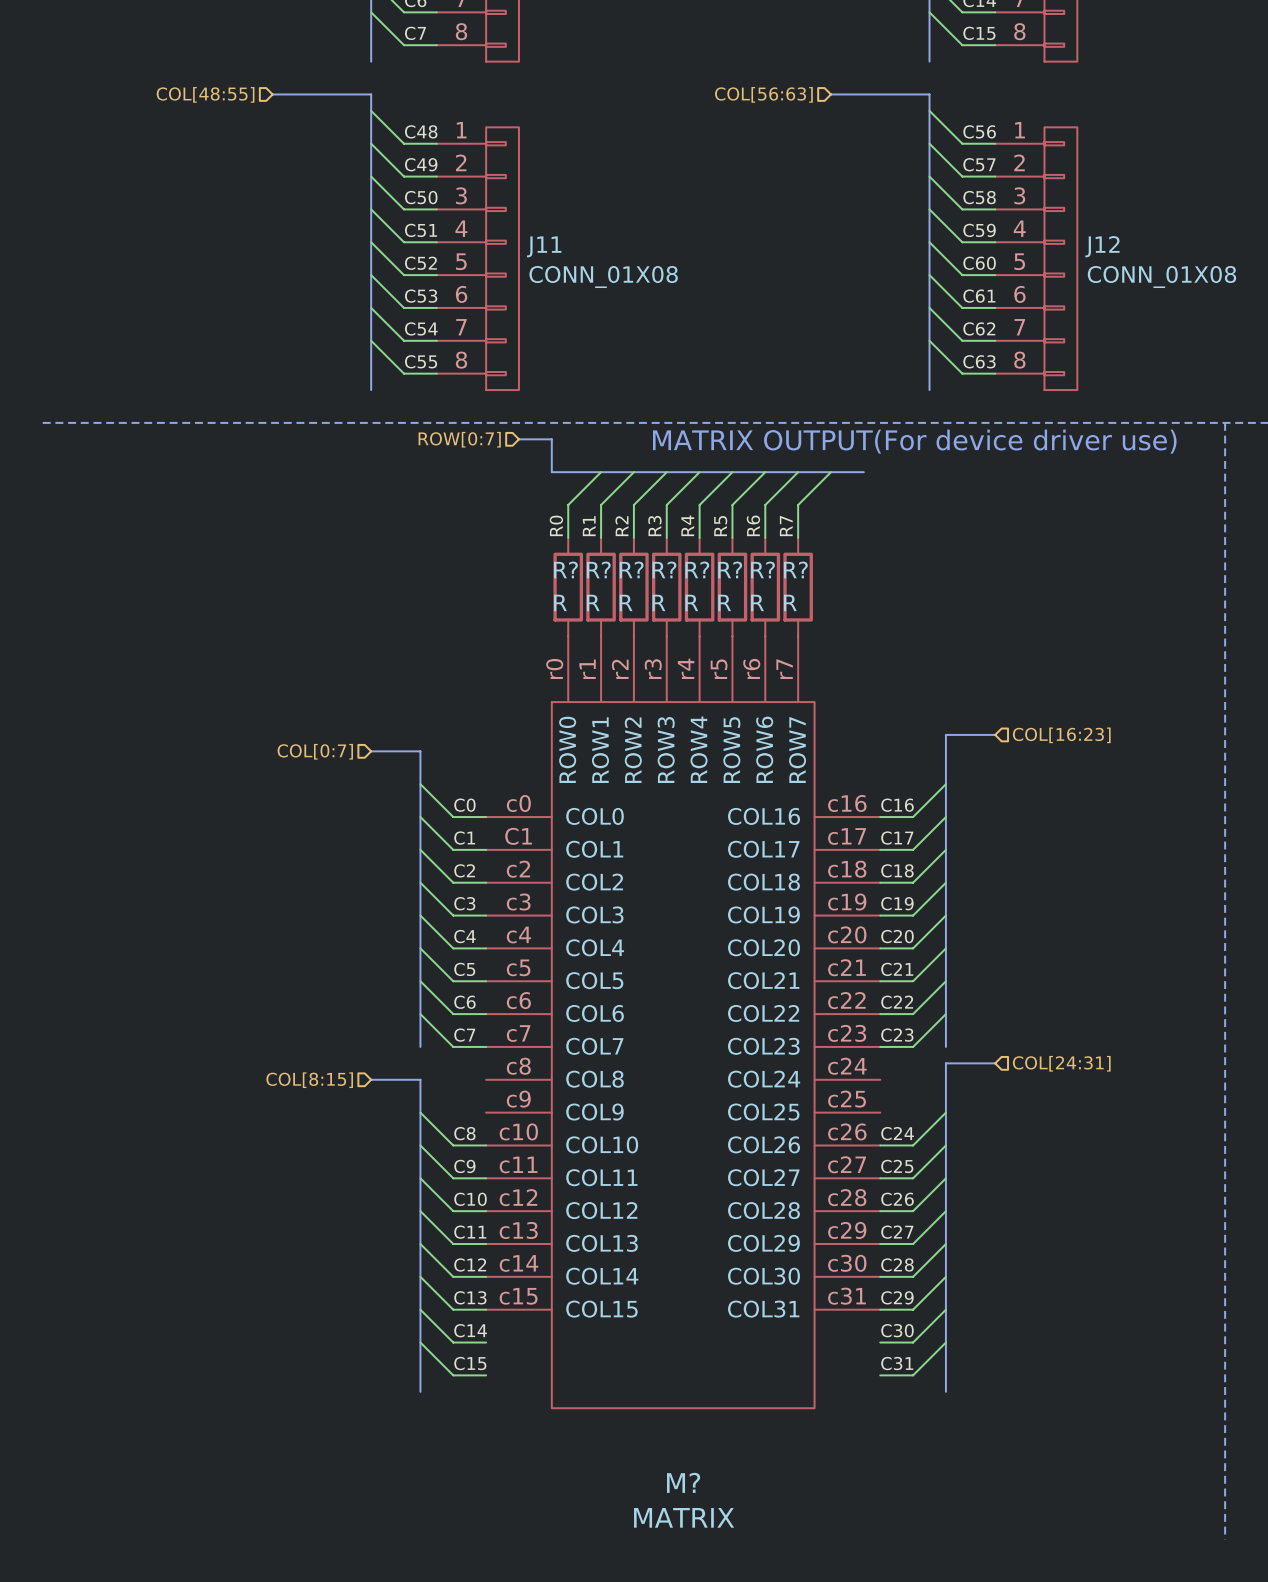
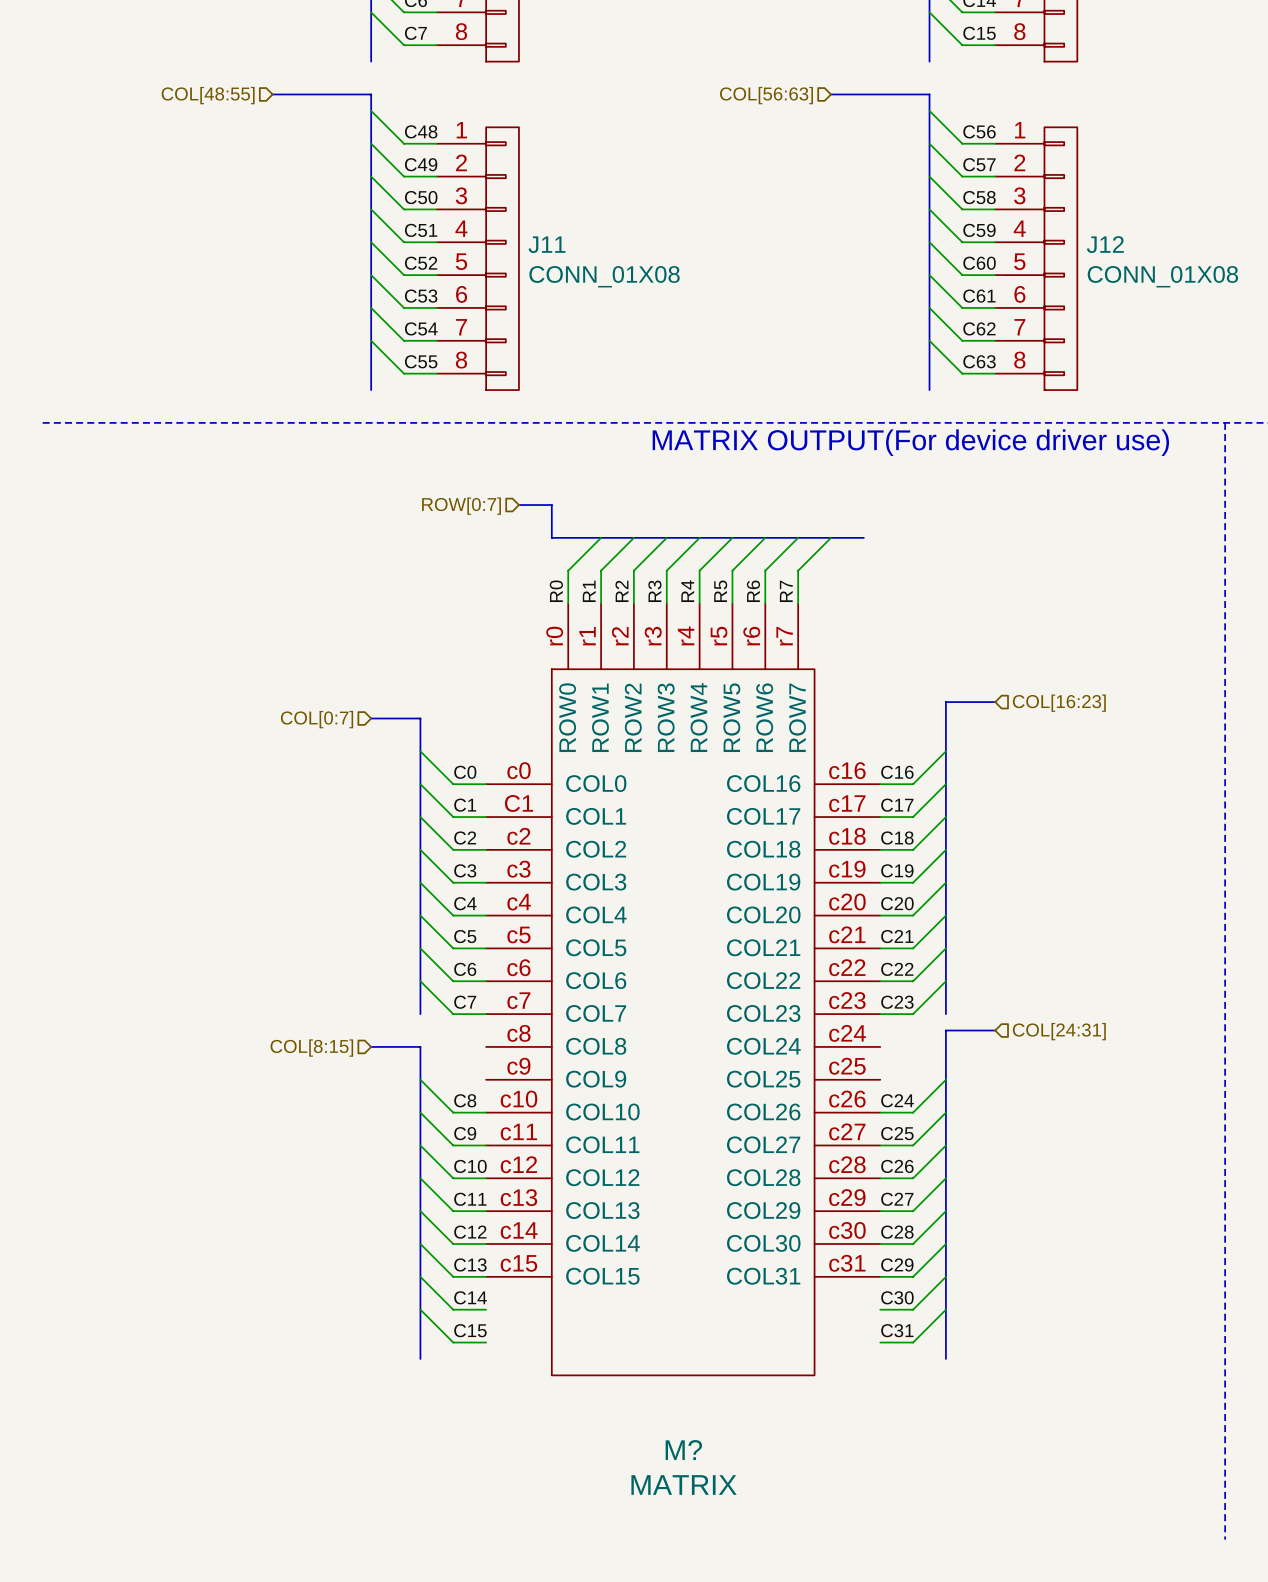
hierarchical label position: ROW[0:7] (459, 439) -> ROW[0:7] (461, 506)
bus: (518, 439) (551, 439) (551, 472) (863, 472) -> (518, 505) (551, 505) (551, 537) (863, 537)
wire: (601, 472) (568, 505) (568, 537) -> (830, 537) (798, 570) (798, 603)
wire: (633, 472) (601, 505) (601, 537) -> (568, 603) (568, 570) (601, 537)
wire: (666, 472) (633, 505) (633, 537) -> (601, 603) (601, 570) (633, 537)
wire: (699, 472) (666, 505) (666, 537) -> (633, 603) (633, 570) (666, 537)
wire: (732, 472) (699, 505) (699, 537) -> (666, 603) (666, 570) (699, 537)
wire: (765, 472) (732, 505) (732, 537) -> (699, 603) (699, 570) (732, 537)
wire: (798, 472) (765, 505) (765, 537) -> (732, 603) (732, 570) (765, 537)
wire: (830, 472) (798, 505) (798, 537) -> (765, 603) (765, 570) (798, 537)
label position: R0 (556, 525) -> R0 (556, 591)
label position: R4 (687, 525) -> R4 (687, 591)
label position: R6 (753, 525) -> R6 (753, 591)
label position: R1 (589, 526) -> R1 (589, 591)
label position: R2 (621, 526) -> R2 (621, 591)
label position: R3 (654, 526) -> R3 (654, 591)
label position: R5 (720, 526) -> R5 (720, 591)
label position: R7 (786, 526) -> R7 (786, 591)
R?: R (568, 587) -> none
R?: R (601, 587) -> none
R?: R (633, 587) -> none
R?: R (666, 587) -> none
R?: R (699, 587) -> none
R?: R (732, 587) -> none
R?: R (765, 587) -> none
R?: R (798, 587) -> none
bus: (945, 734) (995, 734) -> (945, 734) (945, 702) (995, 702)
hierarchical label position: COL[16:23] (1061, 735) -> COL[16:23] (1059, 703)
hierarchical label position: COL[0:7] (315, 751) -> COL[0:7] (317, 719)
bus: (371, 751) (420, 751) -> (371, 718) (420, 718) (420, 751)
wire: none -> (420, 751) (453, 784) (486, 784)
wire: none -> (945, 751) (913, 784) (880, 784)
label: none -> C0 (465, 772)
label: none -> C16 (897, 772)
label: C0 (464, 805) -> C1 (465, 805)
label: C16 (897, 805) -> C17 (897, 805)
label: C1 (464, 838) -> C2 (465, 838)
label: C17 (897, 838) -> C18 (897, 838)
label: C2 (464, 870) -> C3 (465, 870)
label: C18 (897, 870) -> C19 (897, 870)
label: C3 (464, 903) -> C4 (465, 903)
label: C19 (897, 903) -> C20 (897, 903)
label: C4 (465, 936) -> C5 (465, 936)
label: C20 (897, 936) -> C21 (897, 936)
label: C5 (464, 969) -> C6 (465, 969)
label: C21 (897, 969) -> C22 (897, 969)
label: C6 (464, 1002) -> C7 (465, 1002)
label: C22 (897, 1002) -> C23 (897, 1002)
wire: (420, 1014) (453, 1046) (486, 1046) -> (420, 1079) (453, 1112) (486, 1112)
bus: (420, 1014) (420, 1046) -> none
wire: (945, 1014) (913, 1046) (880, 1046) -> (945, 1079) (913, 1112) (880, 1112)
bus: (945, 1014) (945, 1030) -> (995, 1030) (945, 1030)
M? position: (683, 1022) -> (683, 989)
label: C7 (464, 1035) -> none
label: C23 (897, 1035) -> none
bus: (945, 1063) (995, 1063) -> (945, 1063) (945, 1046)
hierarchical label position: COL[24:31] (1061, 1063) -> COL[24:31] (1059, 1031)
bus: (371, 1079) (420, 1079) -> (371, 1046) (420, 1046) (420, 1079)
hierarchical label position: COL[8:15] (309, 1080) -> COL[8:15] (311, 1048)
label: none -> C8 (465, 1100)
label: none -> C24 (897, 1100)
label: C8 (464, 1133) -> C9 (465, 1133)
label: C24 (897, 1133) -> C25 (897, 1133)
label: C9 (464, 1166) -> C10 (470, 1166)
label: C25 (897, 1166) -> C26 (897, 1166)
label: C10 (470, 1199) -> C11 (470, 1199)
label: C26 (897, 1199) -> C27 (897, 1199)
label: C11 (470, 1232) -> C12 (470, 1232)
label: C27 (897, 1232) -> C28 (897, 1232)
label: C12 (470, 1264) -> C13 (470, 1264)
label: C28 (897, 1264) -> C29 (897, 1264)
label: C13 (470, 1297) -> C14 (470, 1297)
label: C29 (897, 1297) -> C30 (897, 1297)
label: C14 (470, 1330) -> C15 (470, 1330)
label: C30 (897, 1330) -> C31 (897, 1330)
wire: (420, 1342) (453, 1375) (486, 1375) -> none
wire: (945, 1342) (913, 1375) (880, 1375) -> none
bus: (420, 1358) (420, 1391) -> none
bus: (945, 1358) (945, 1391) -> none
label: C15 (470, 1363) -> none
label: C31 (897, 1363) -> none

